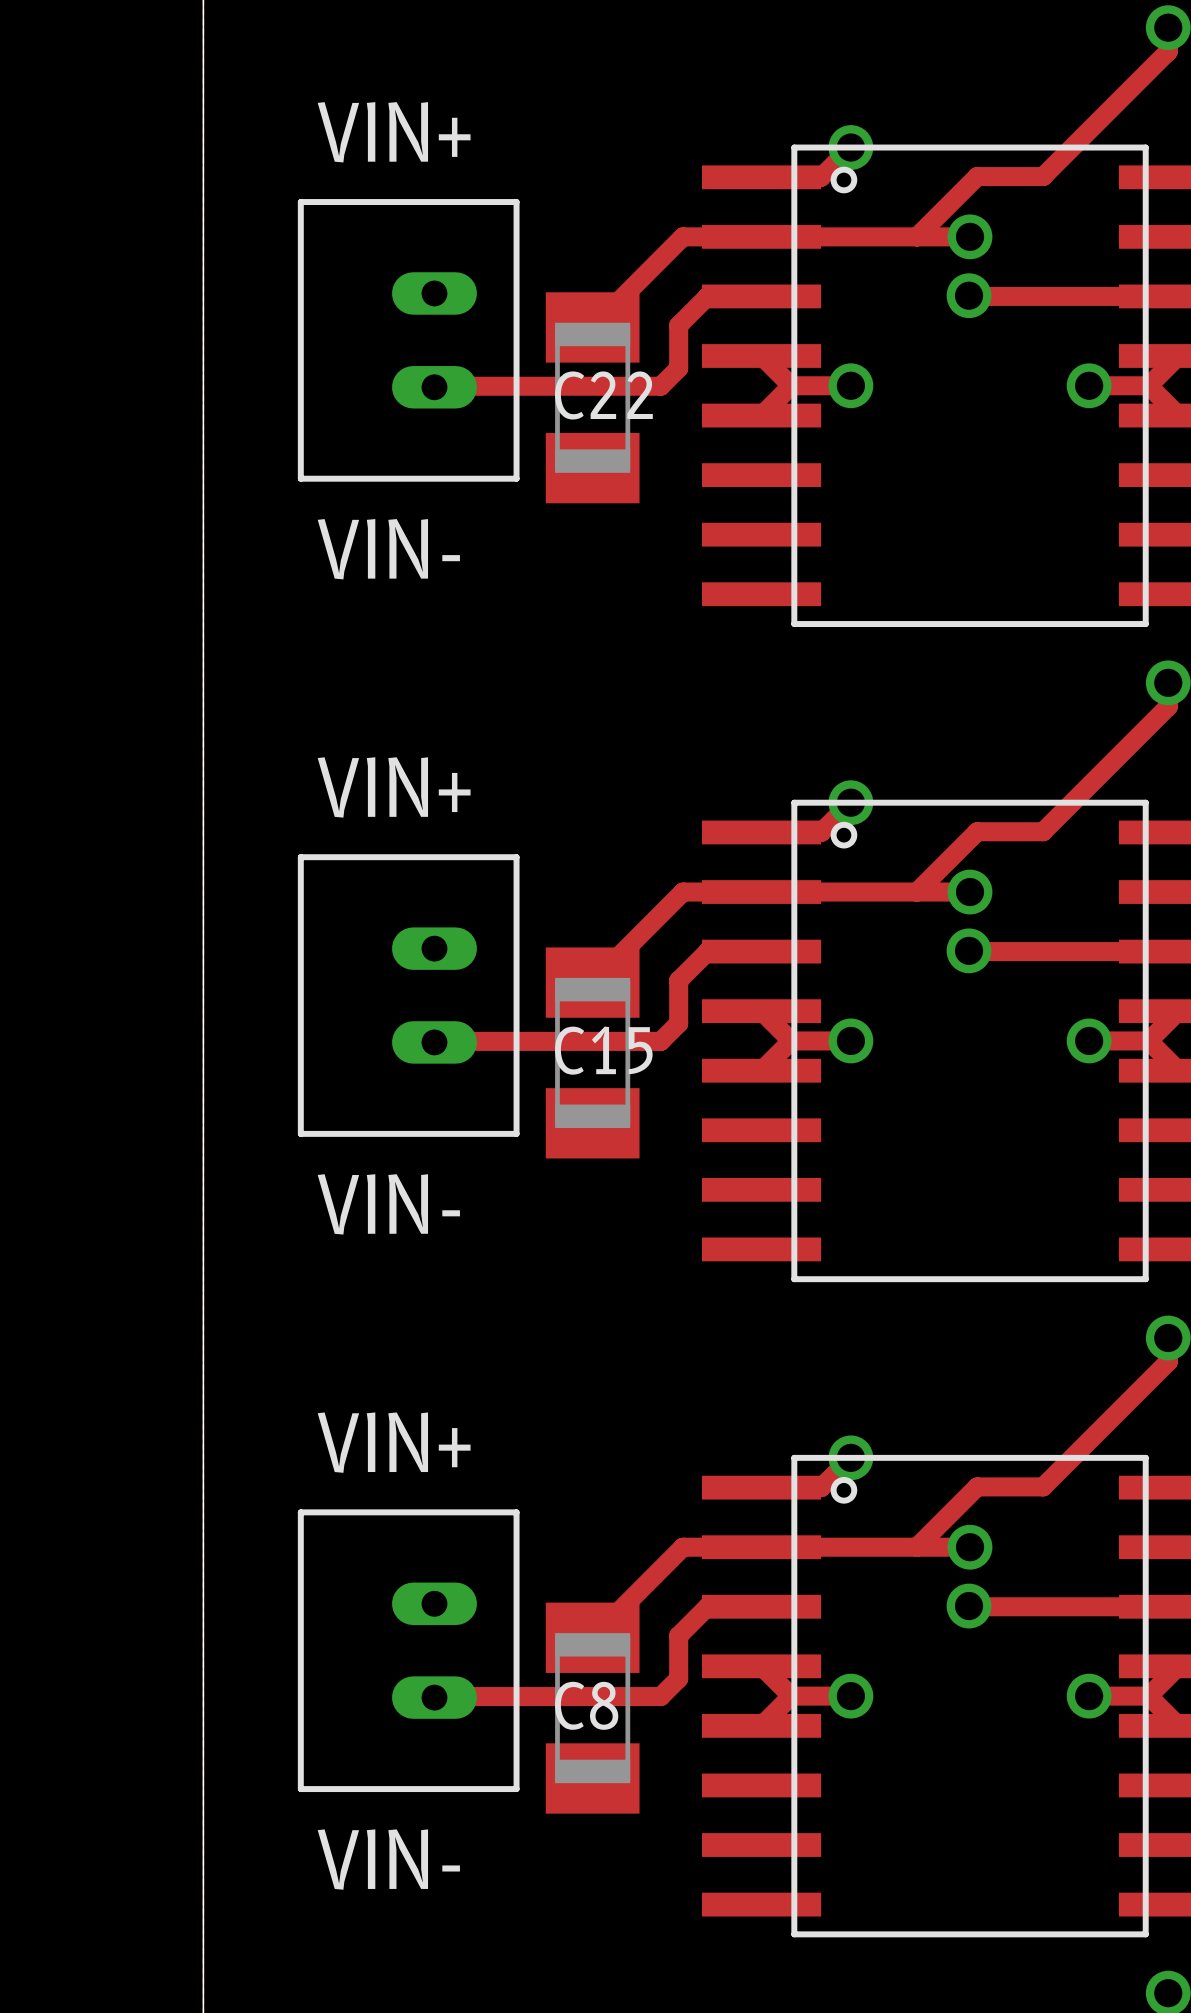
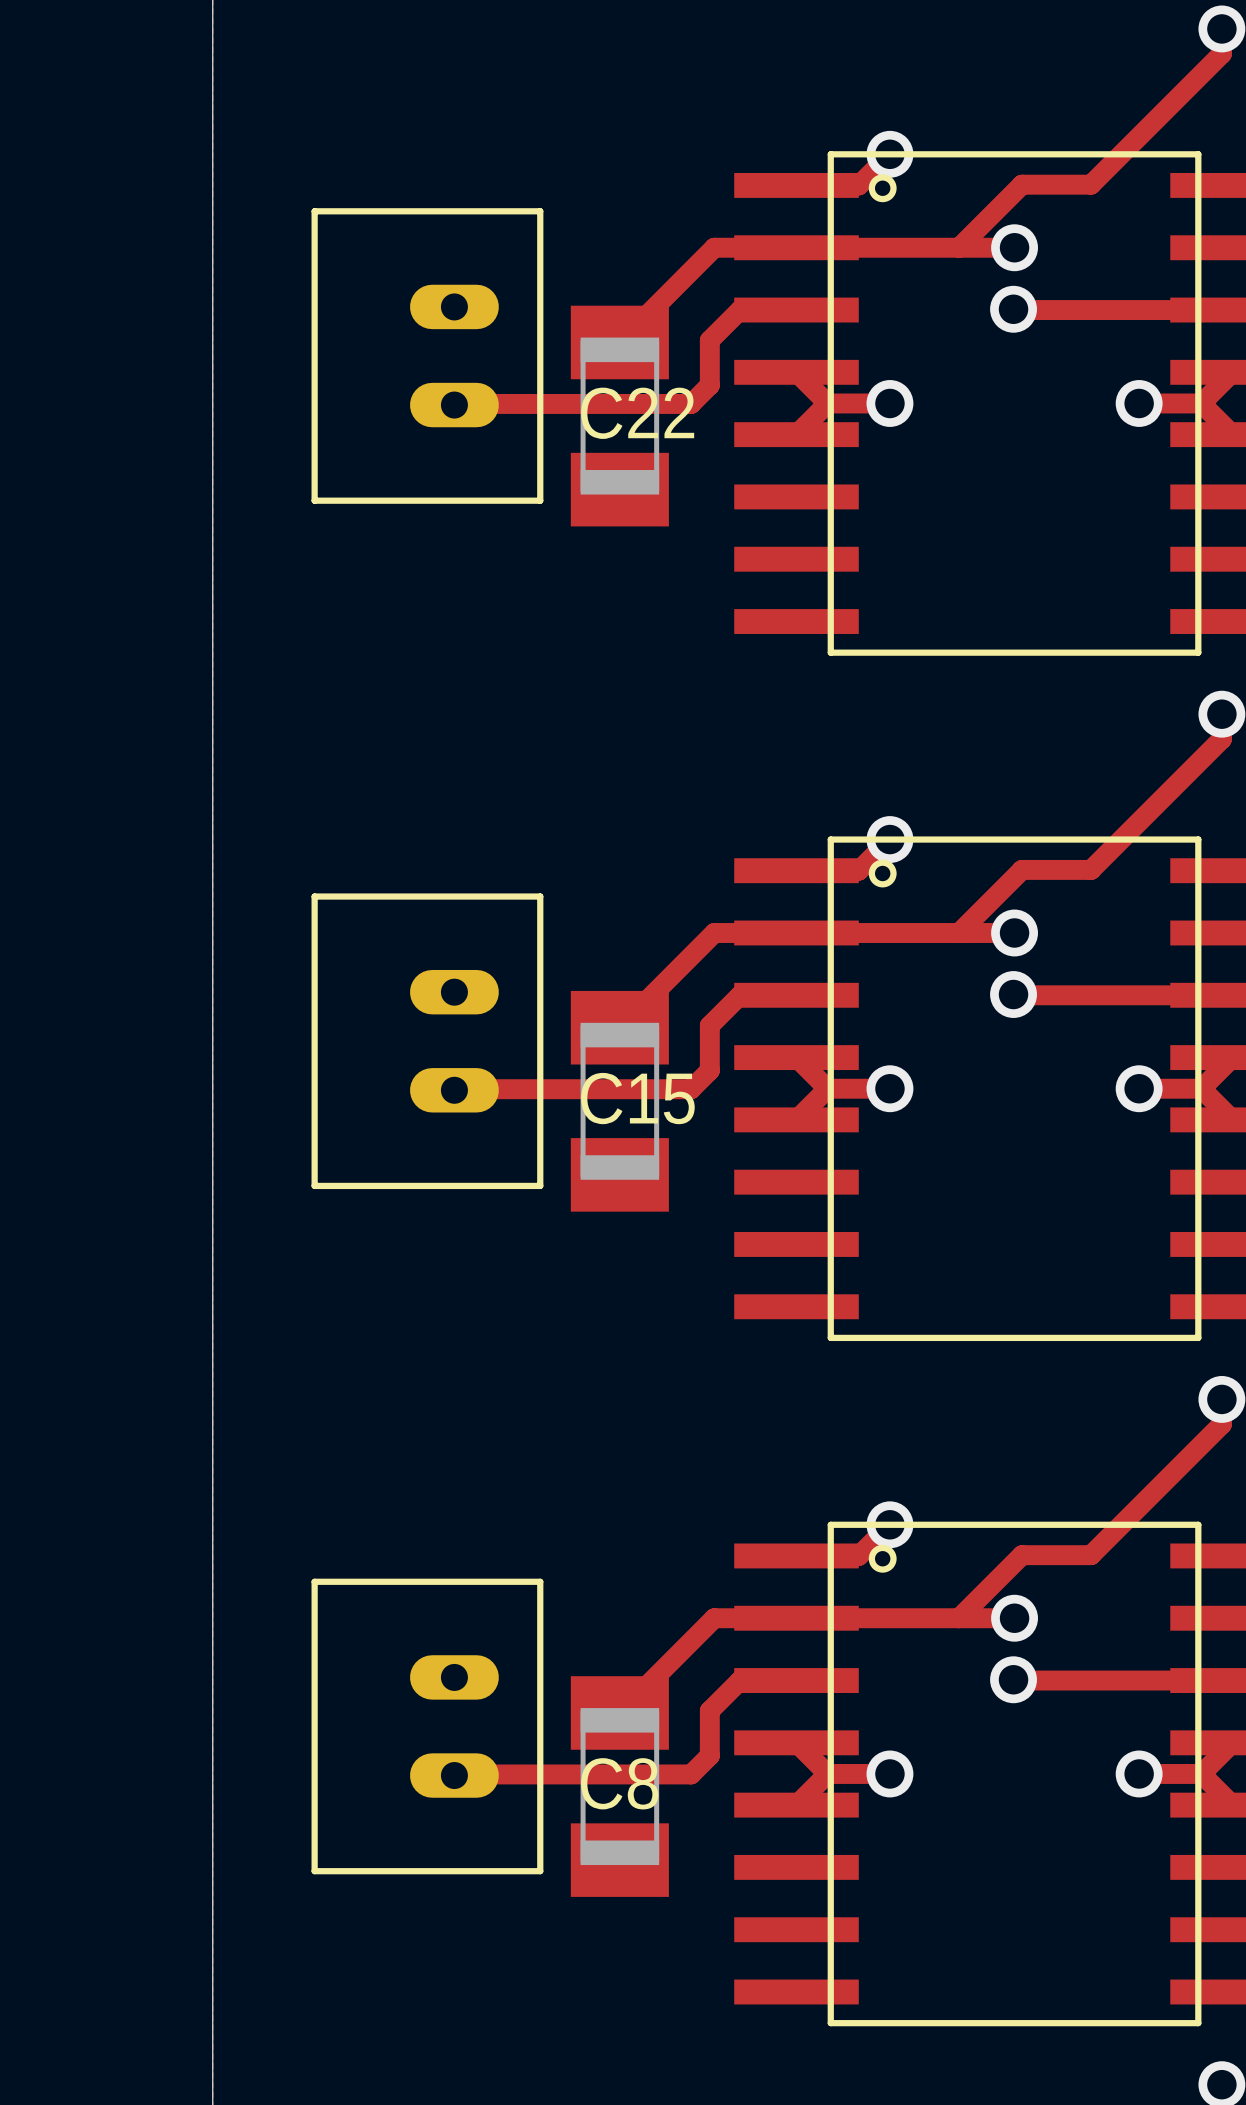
part text: VIN+ (394, 132) -> none
part text: VIN- (388, 549) -> none
part text: VIN+ (394, 787) -> none
part text: VIN- (388, 1204) -> none
part text: VIN+ (394, 1442) -> none
part text: VIN- (388, 1859) -> none

